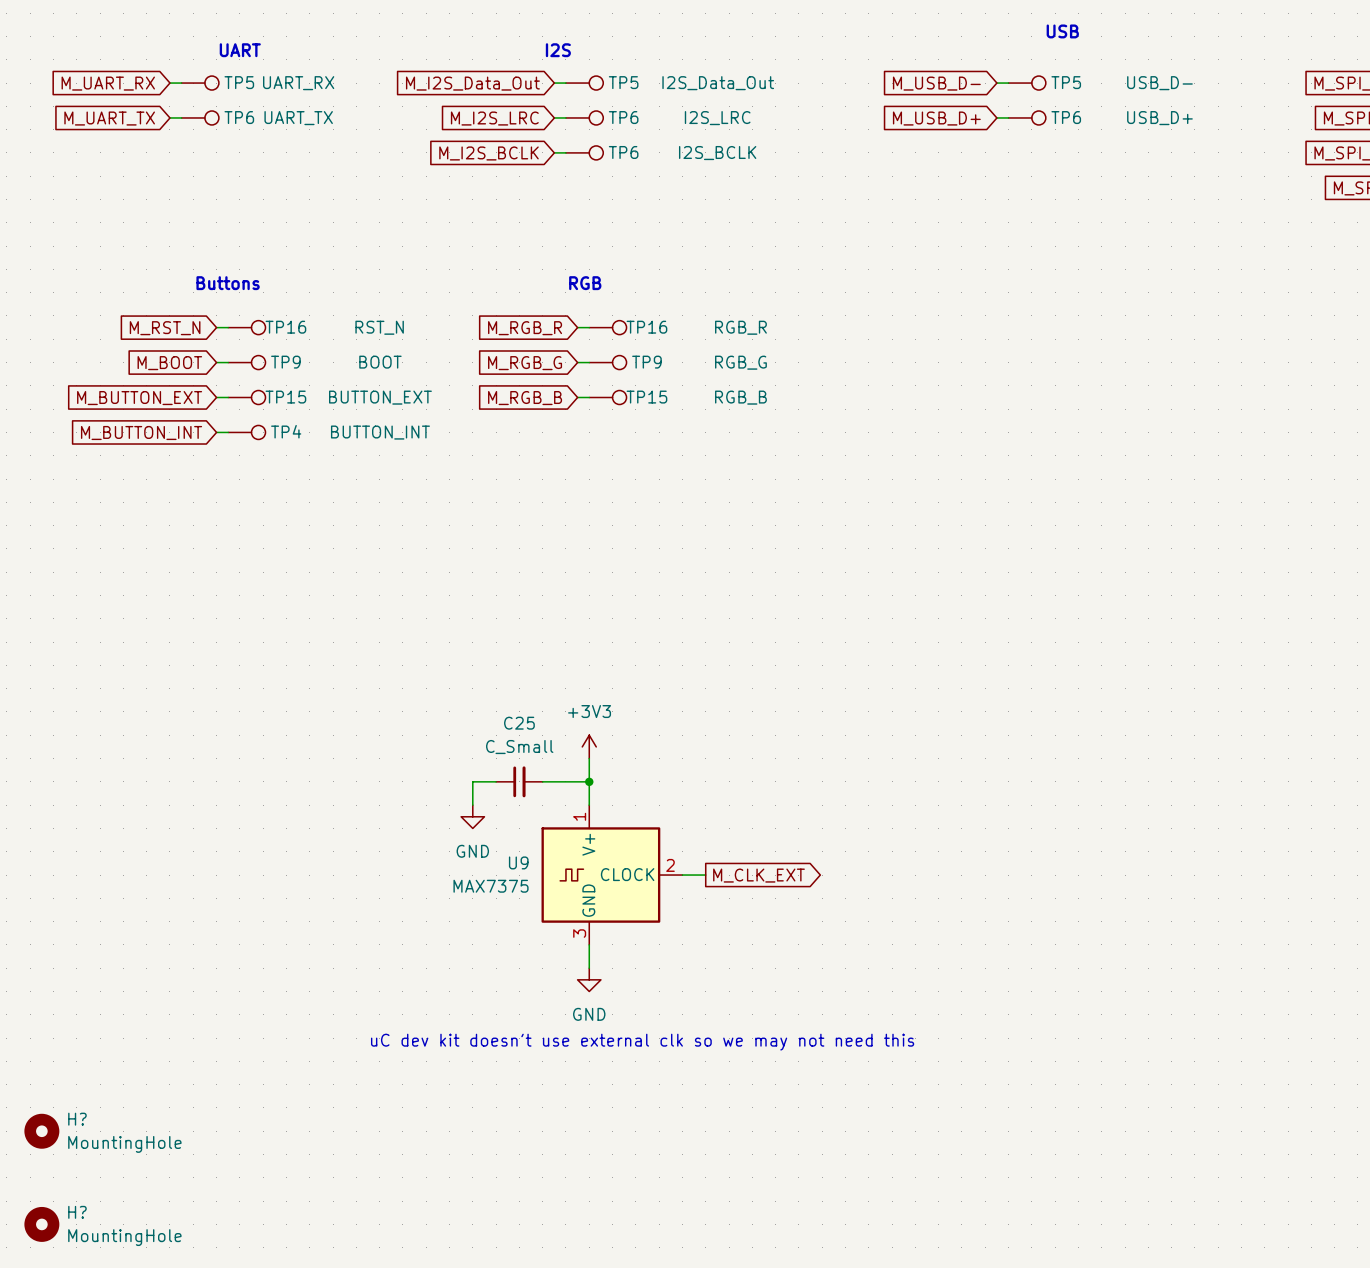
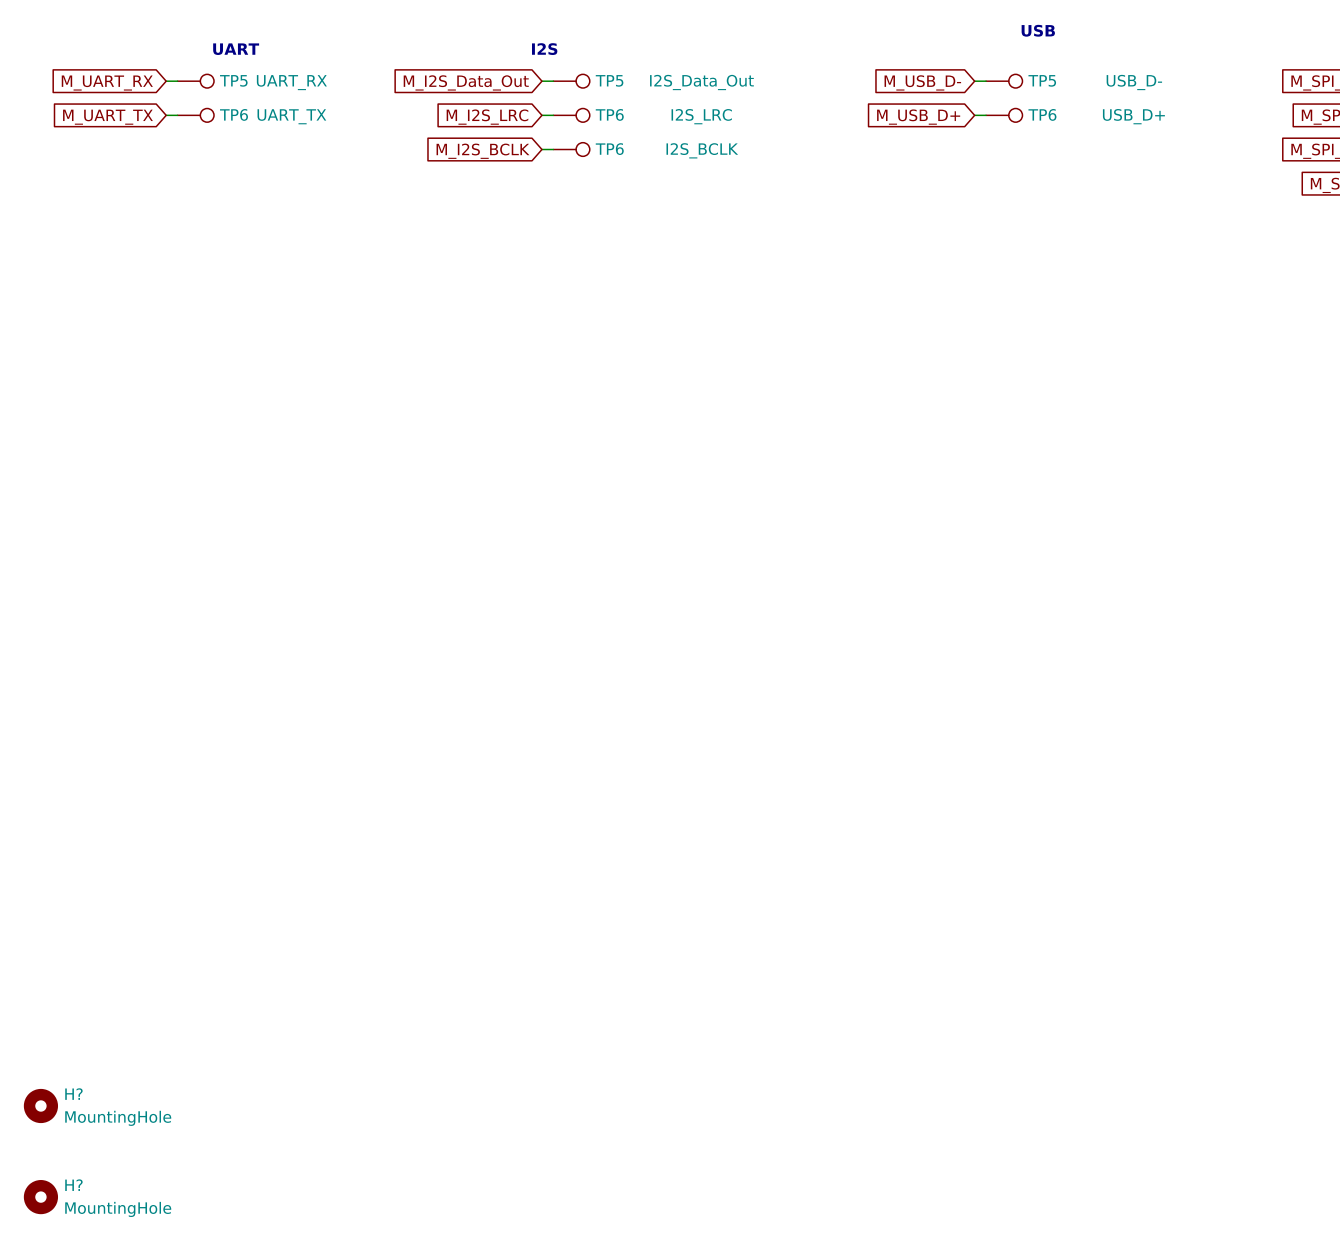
text: Buttons (228, 283) -> none
text: RGB (585, 283) -> none
wire: (216, 327) (228, 327) -> none
TP16: RST_N (246, 327) -> none
wire: (577, 327) (589, 327) -> none
TP16: RGB_R (607, 327) -> none
global label: M_RST_N (165, 328) -> none
global label: M_RGB_R (525, 328) -> none
wire: (216, 362) (228, 362) -> none
TP9: BOOT (246, 362) -> none
wire: (577, 362) (589, 362) -> none
TP9: RGB_G (607, 362) -> none
global label: M_BOOT (169, 363) -> none
global label: M_RGB_G (525, 363) -> none
wire: (216, 397) (228, 397) -> none
TP15: BUTTON_EXT (246, 397) -> none
wire: (577, 397) (589, 397) -> none
TP15: RGB_B (607, 397) -> none
global label: M_BUTTON_EXT (139, 398) -> none
global label: M_RGB_B (525, 398) -> none
wire: (216, 432) (228, 432) -> none
TP4: BUTTON_INT (246, 432) -> none
global label: M_BUTTON_INT (141, 433) -> none
power symbol: +3V3 (589, 746) -> none
wire: (589, 758) (589, 805) -> none
wire: (496, 781) (472, 781) (472, 805) -> none
C25: C_Small (519, 781) -> none
wire: (542, 781) (589, 781) -> none
junction: (589, 781) -> none
power symbol: GND (472, 816) -> none
U9: MAX7375 (611, 875) -> none
wire: (682, 875) (705, 875) -> none
global label: M_CLK_EXT (758, 875) -> none
wire: (589, 944) (589, 968) -> none
power symbol: GND (589, 979) -> none
text: uC dev kit doesn't use external clk so we may not need this (642, 1042) -> none

